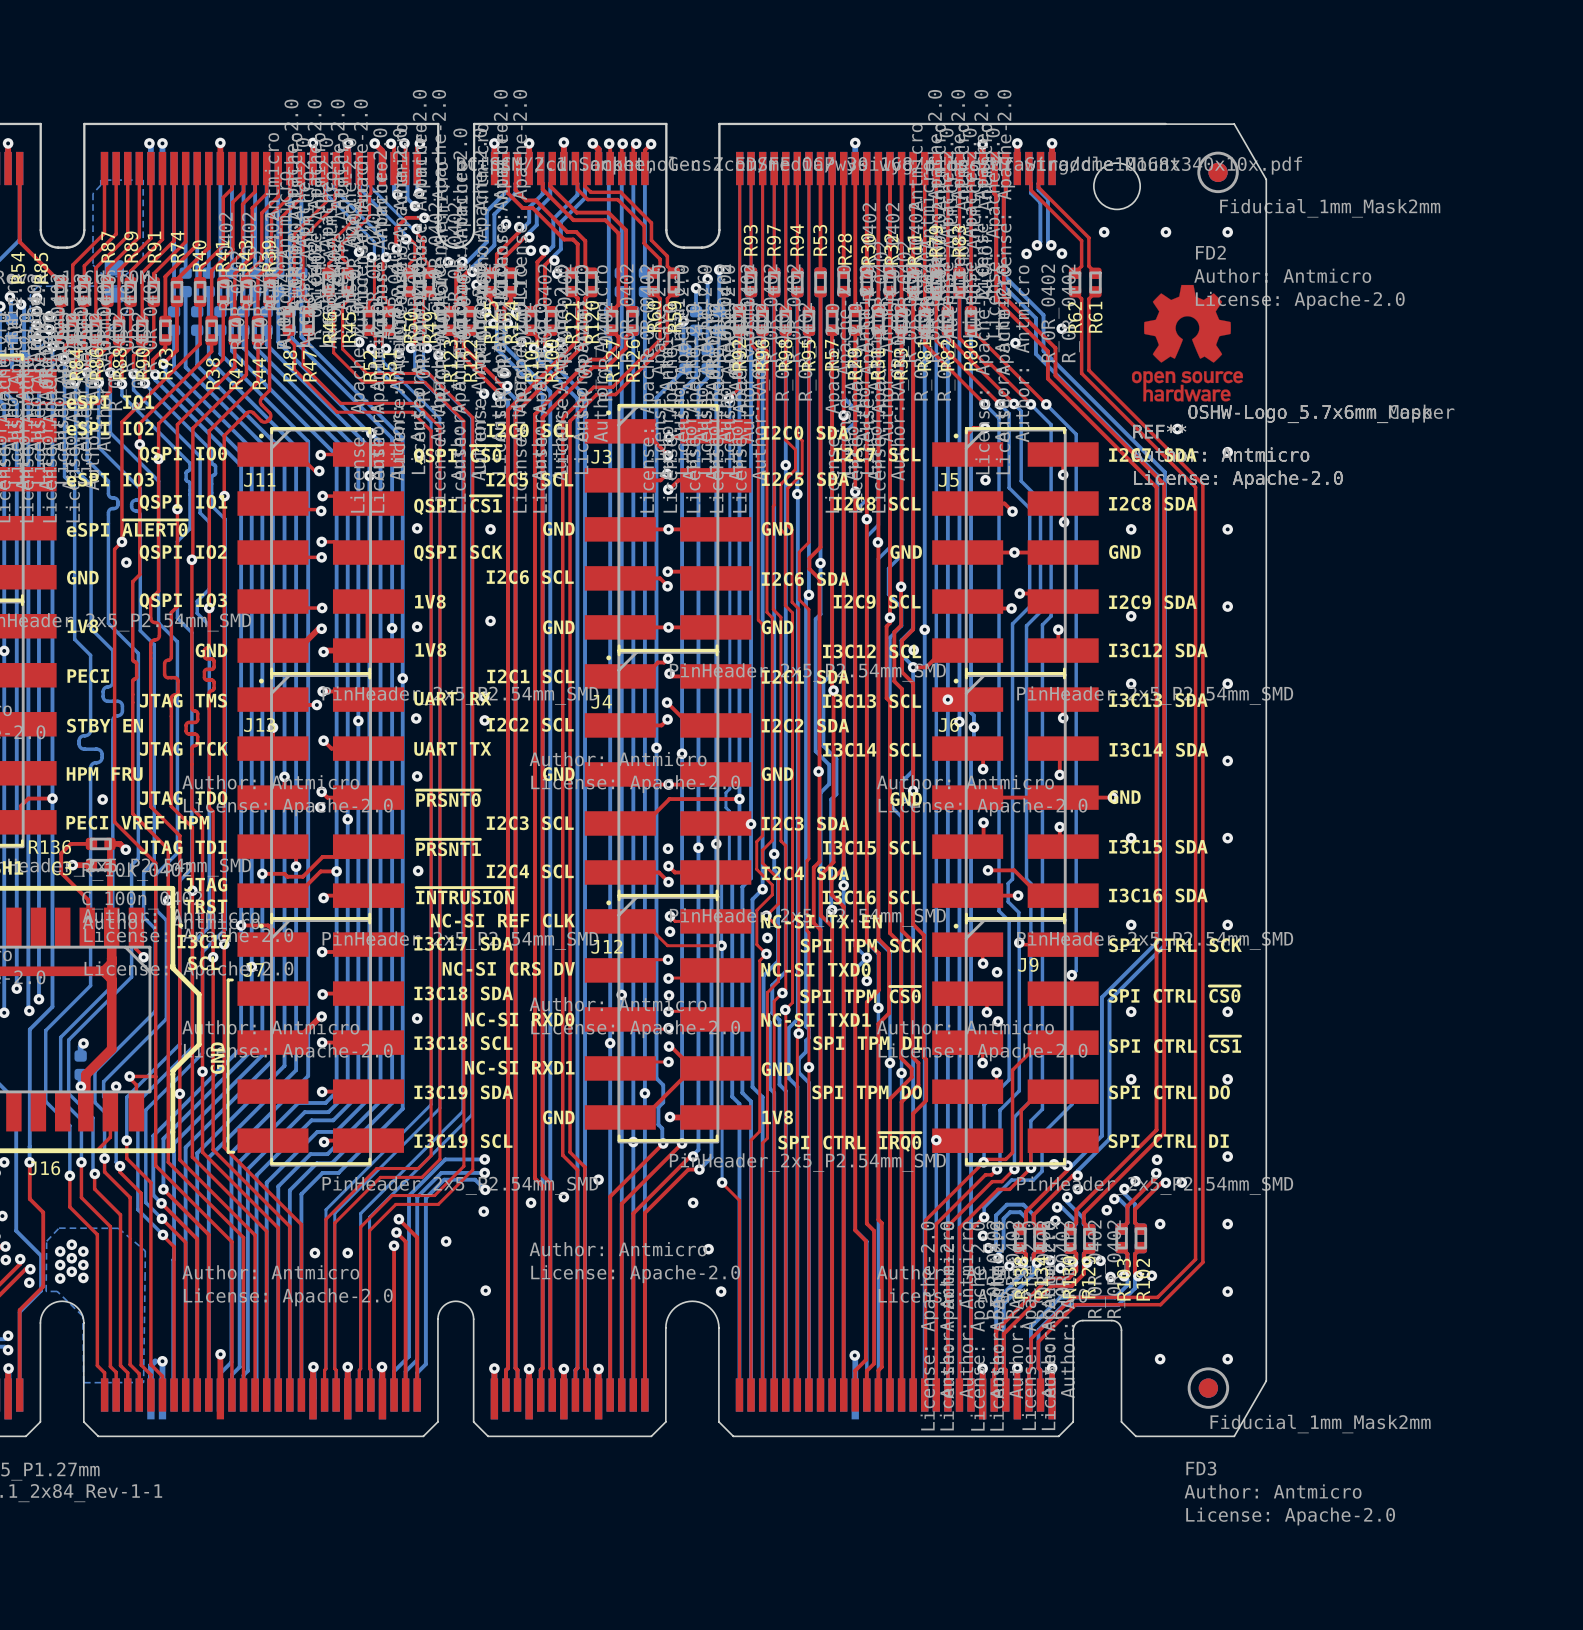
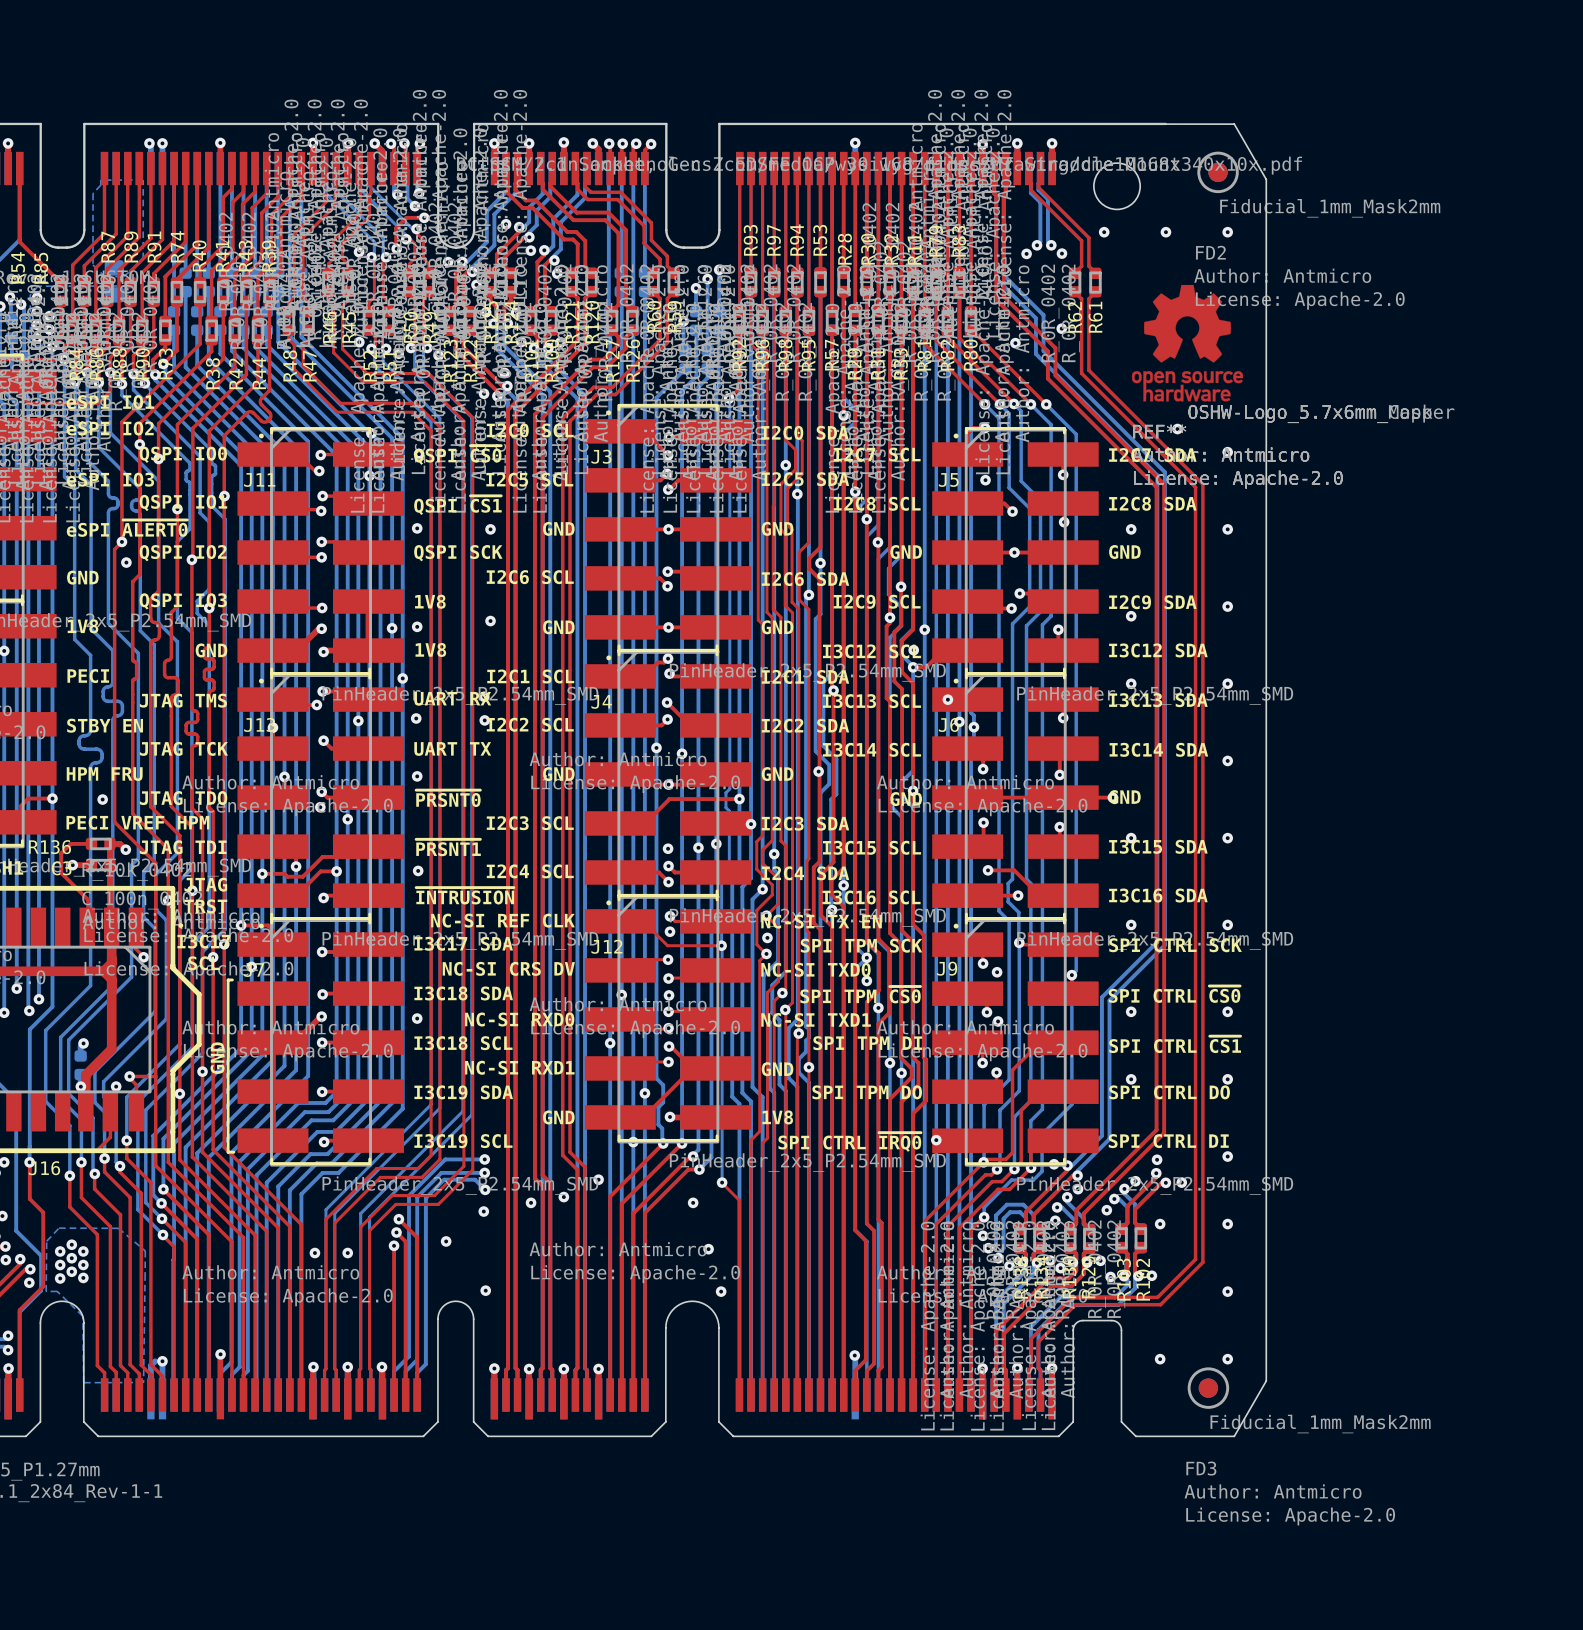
J9 name position: J9 (1028, 964) -> J9 (947, 968)

